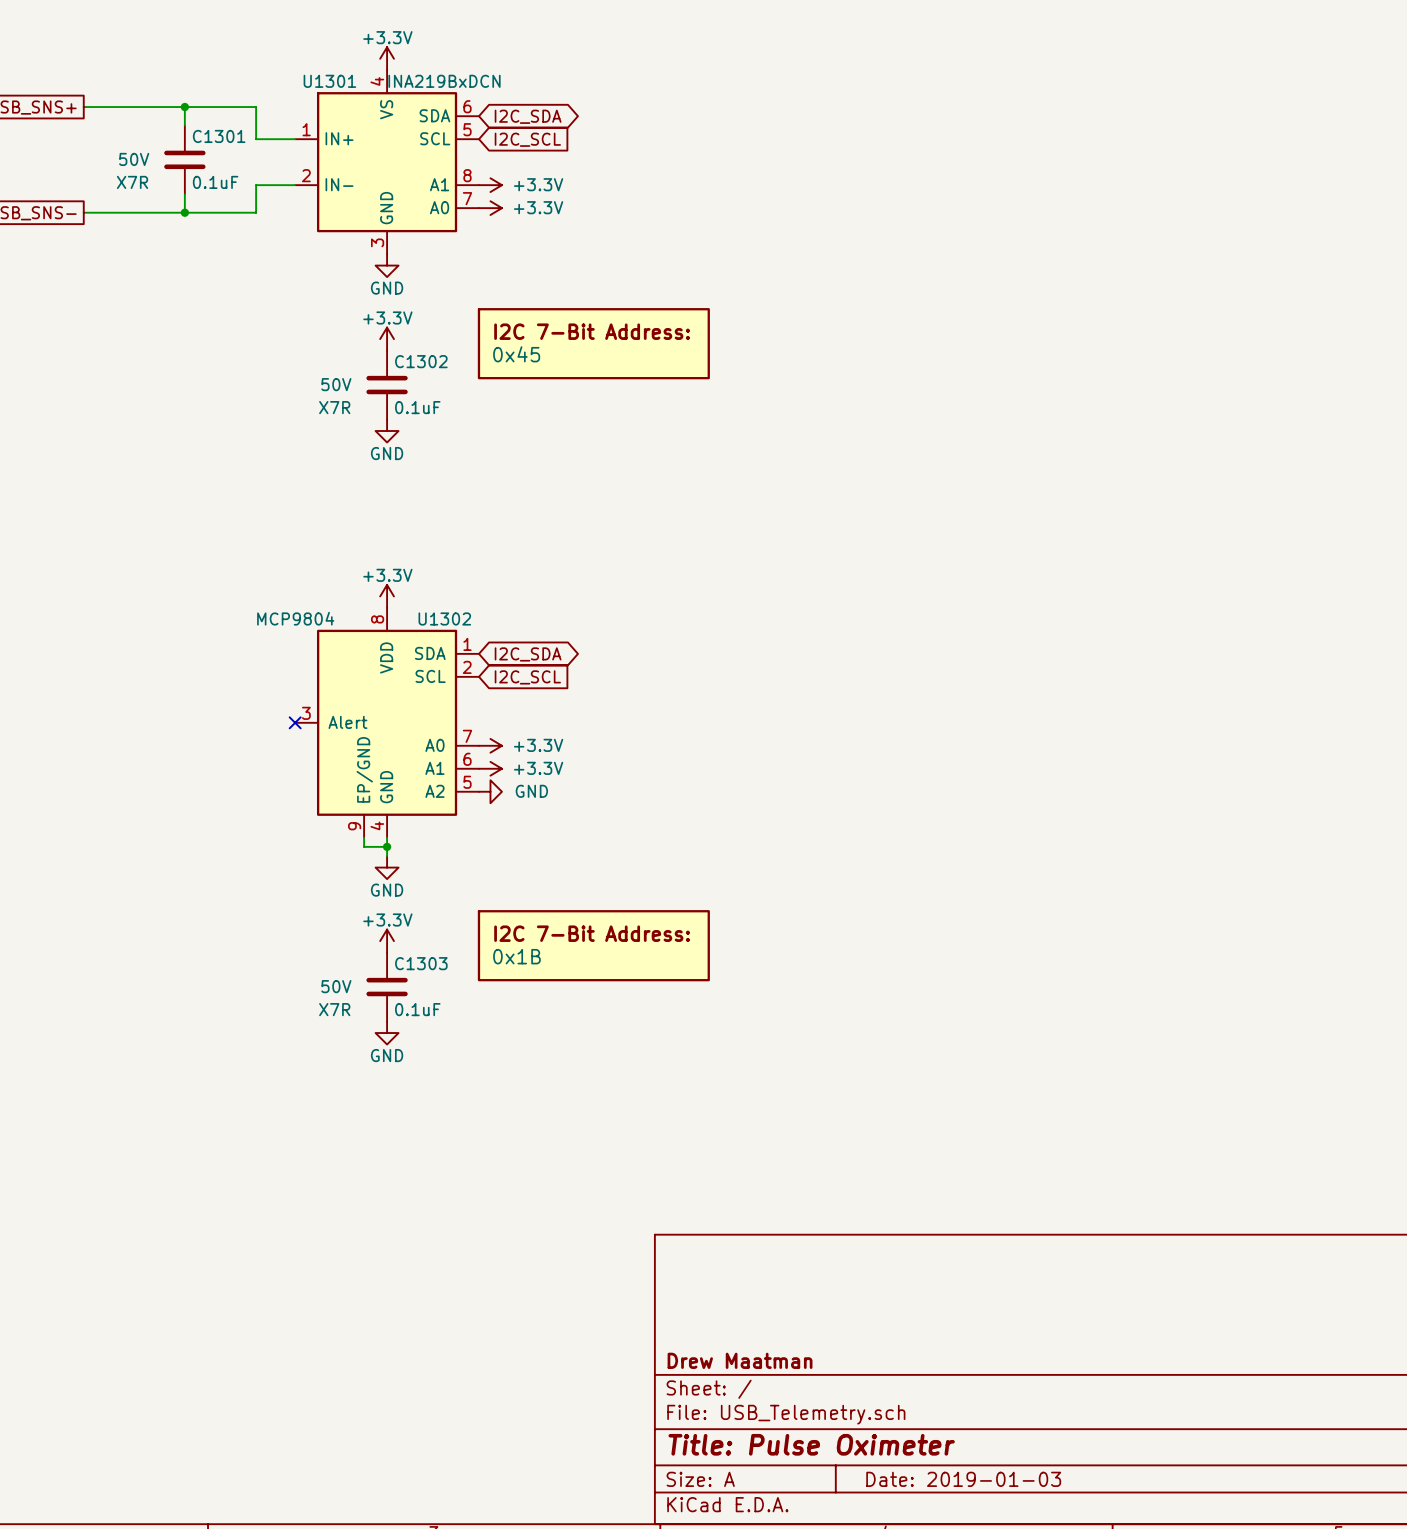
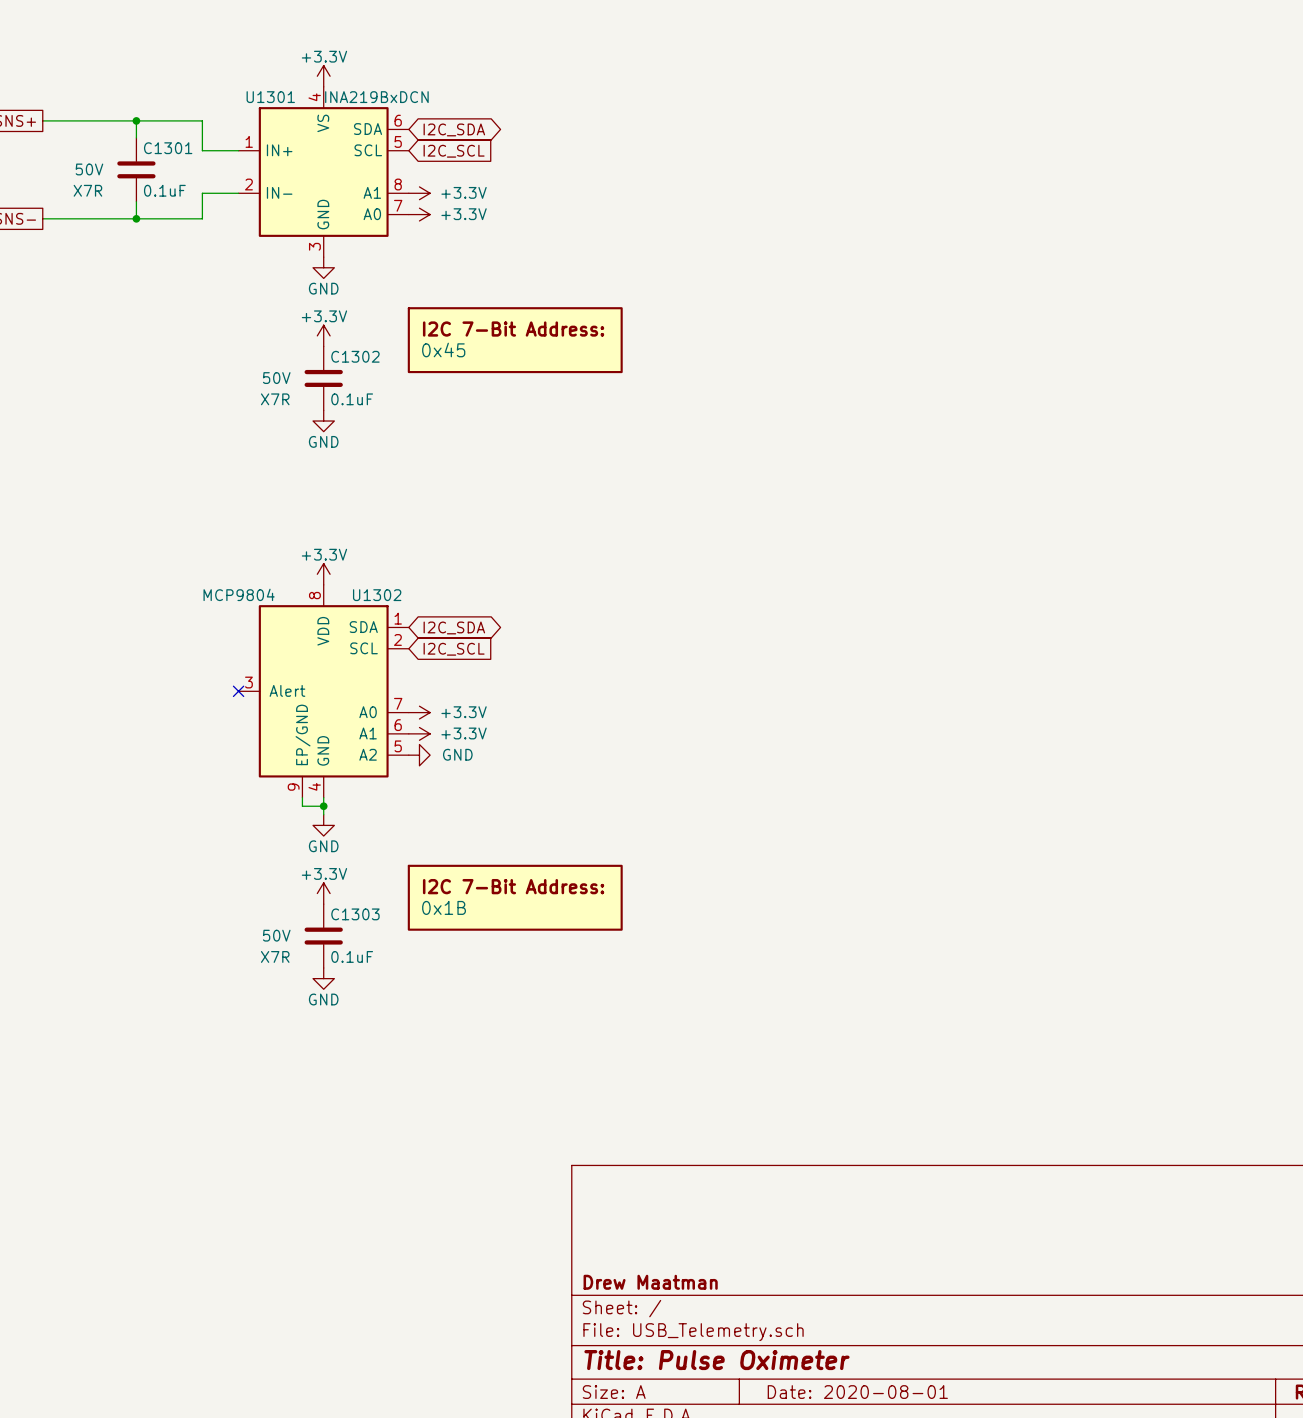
title block: Date: 2019-01-03 (963, 1479) -> Date: 2020-08-01 (857, 1392)

